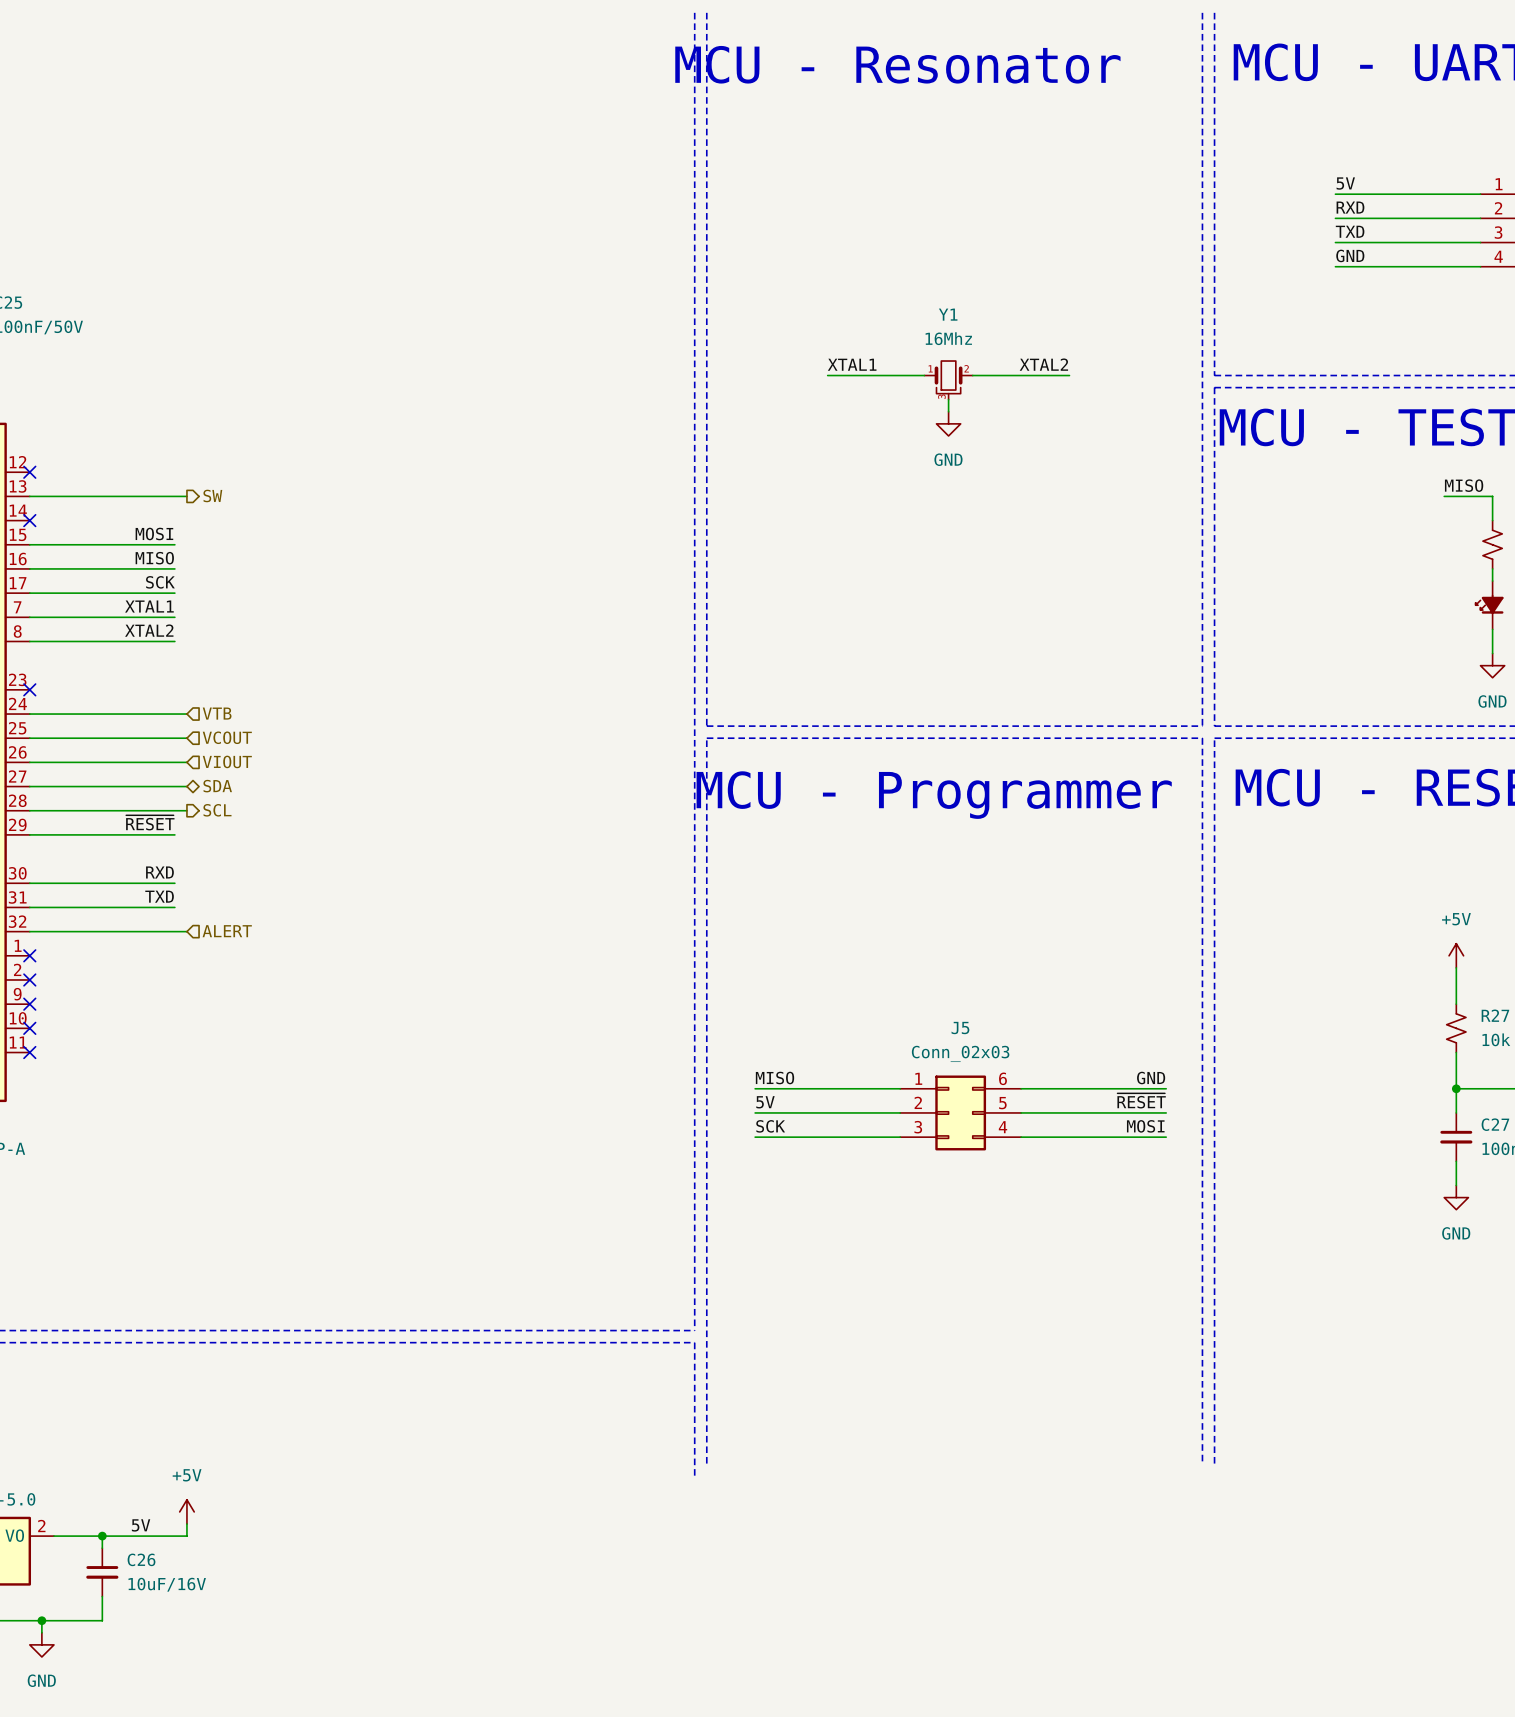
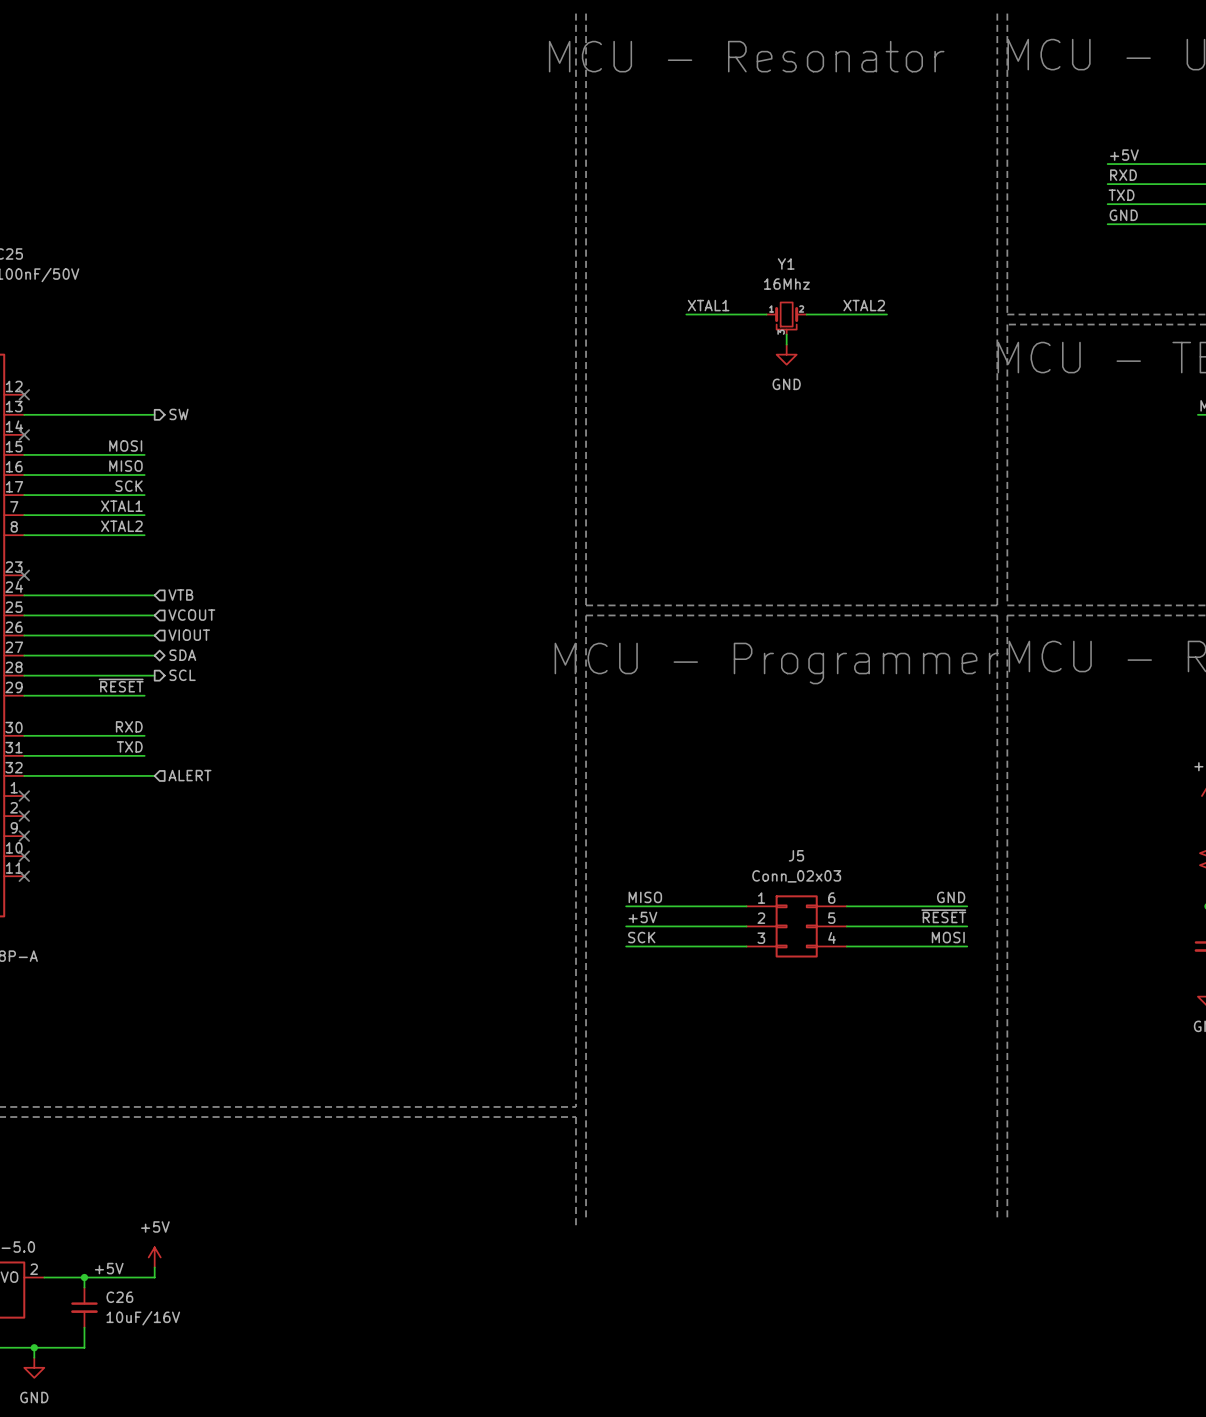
label: 5V (1345, 183) -> +5V (1124, 155)
label: 5V (765, 1102) -> +5V (642, 917)
label: 5V (141, 1525) -> +5V (109, 1268)

